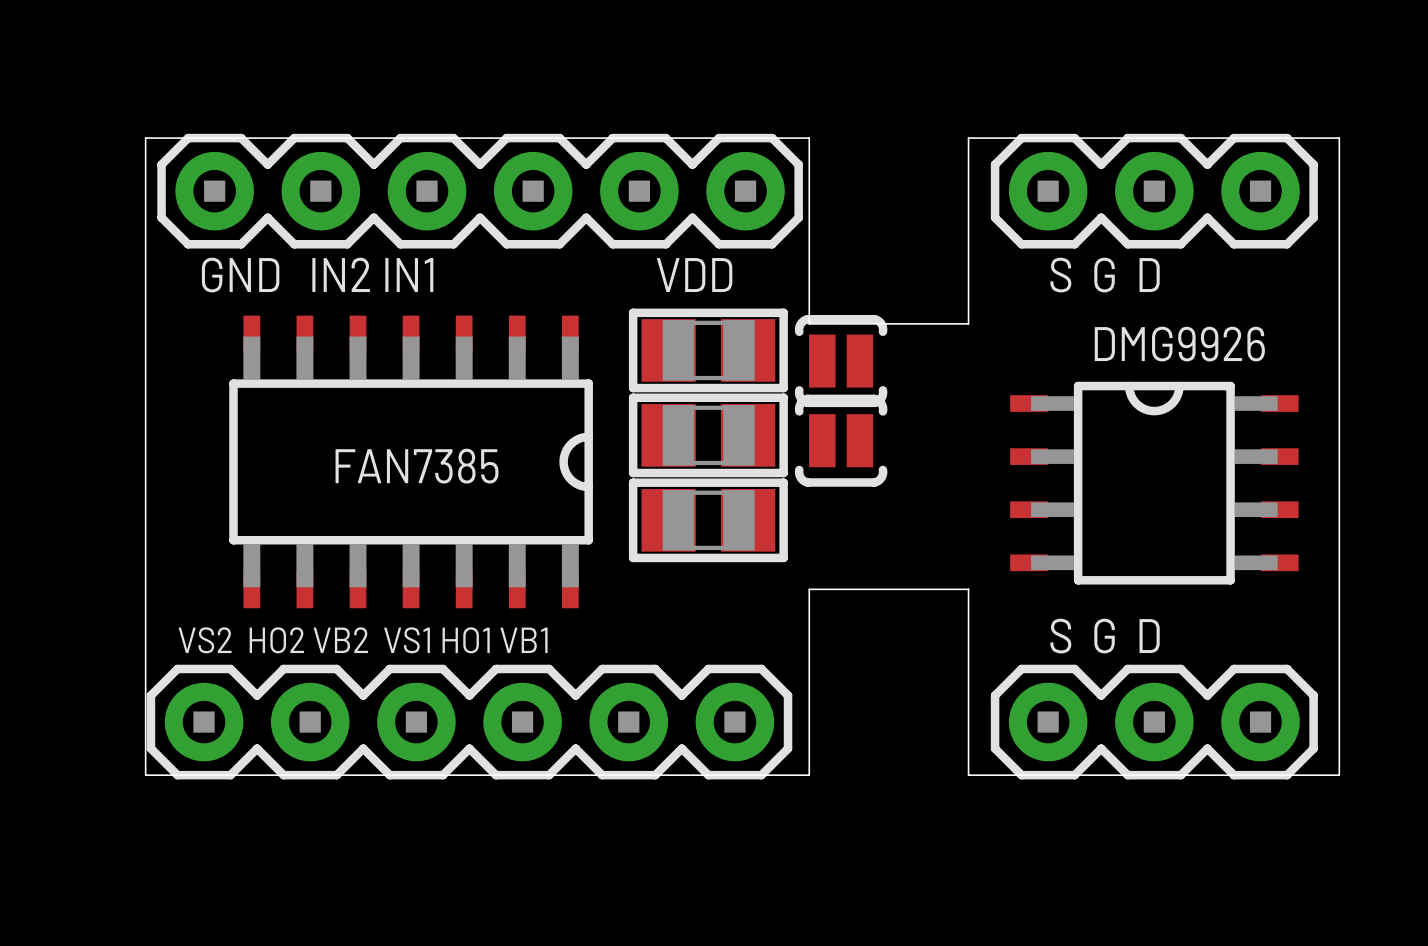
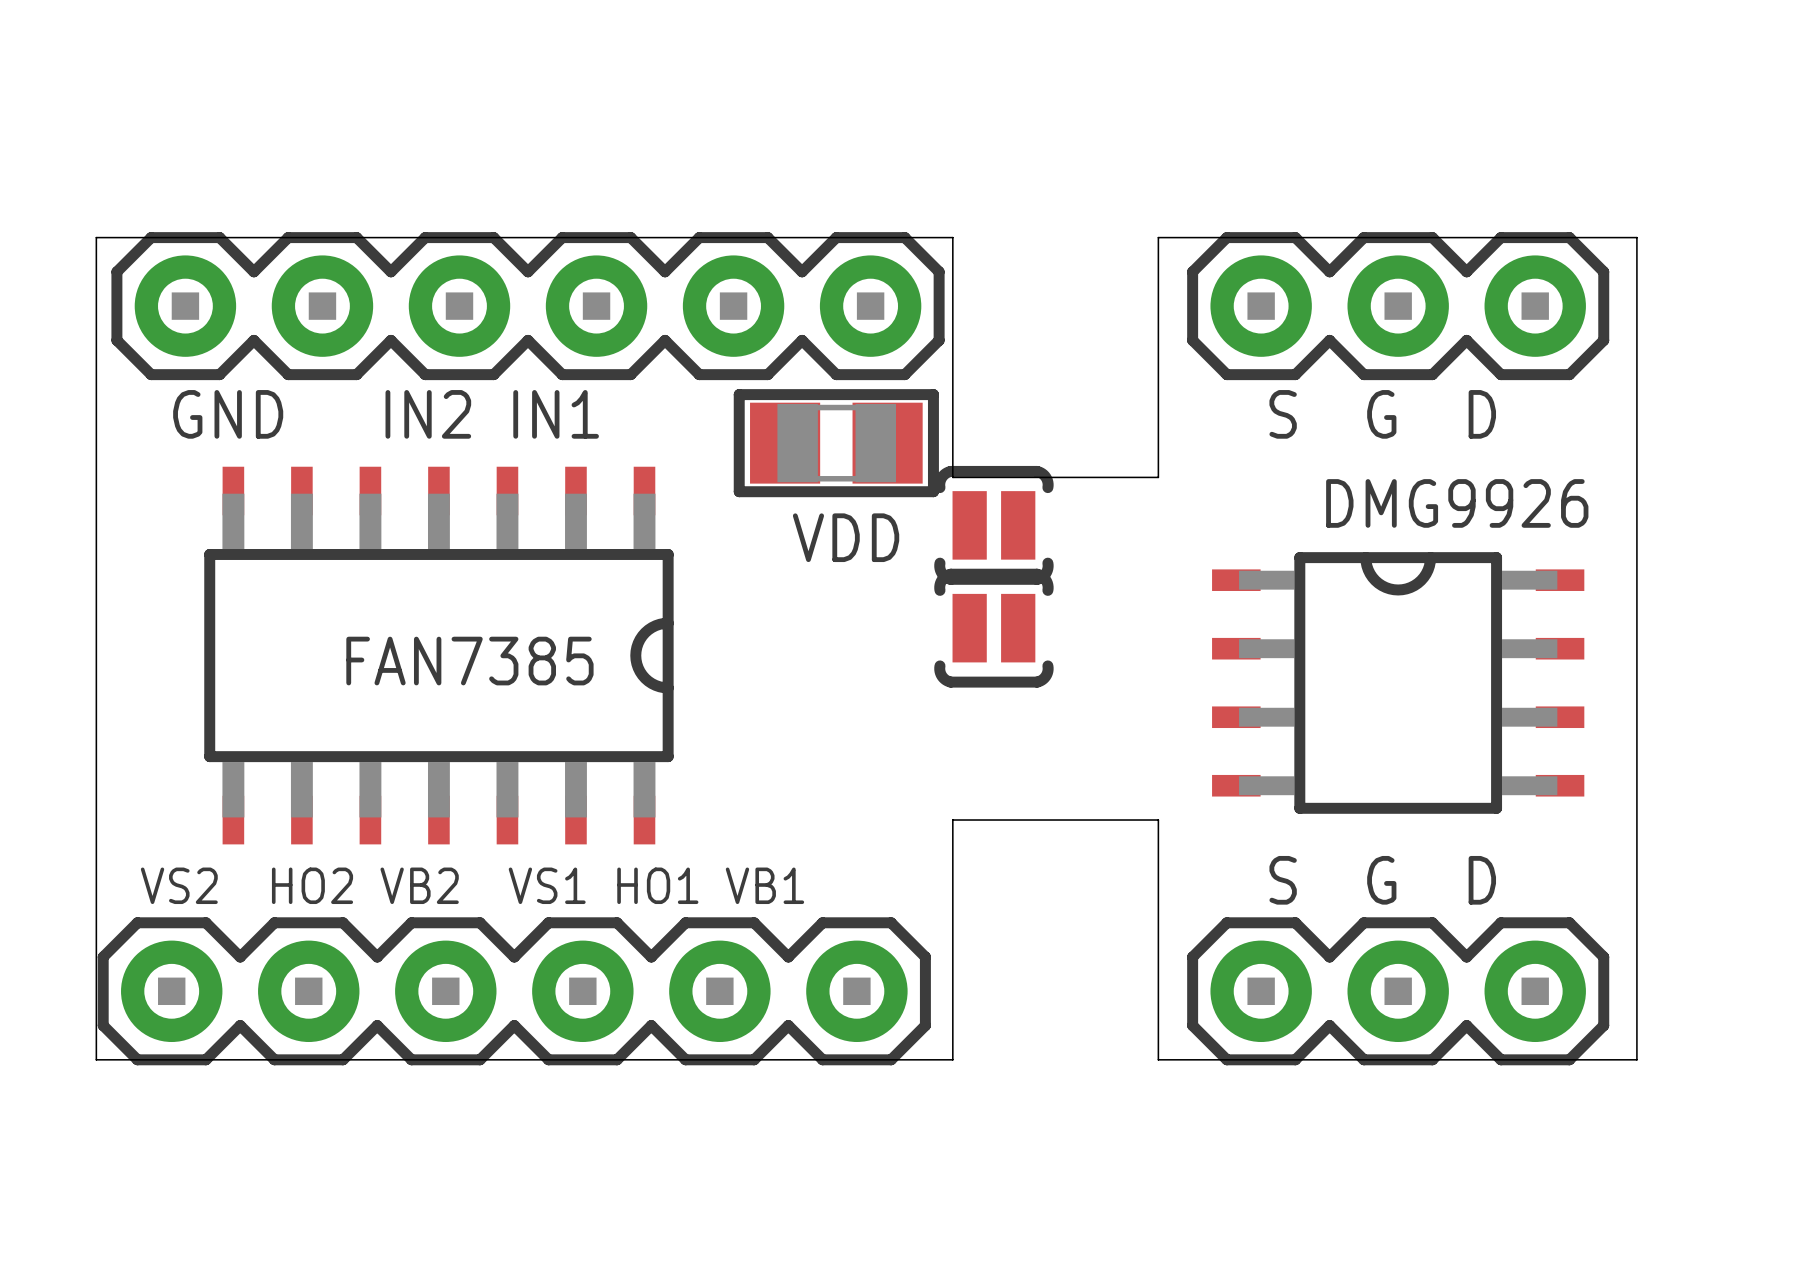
text position: VDD (694, 275) -> VDD (846, 537)
part position: (708, 350) -> (836, 443)
part: (708, 435) -> none
part: (708, 520) -> none

